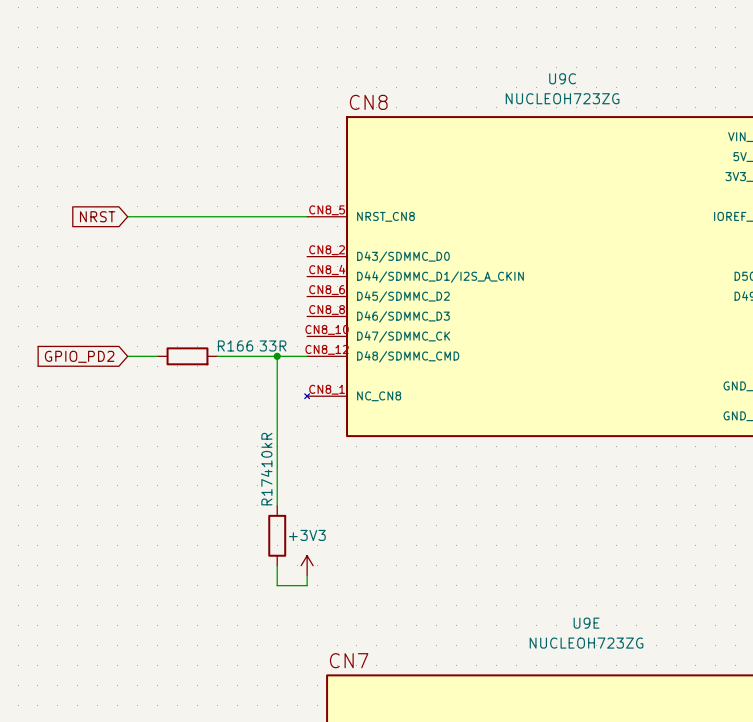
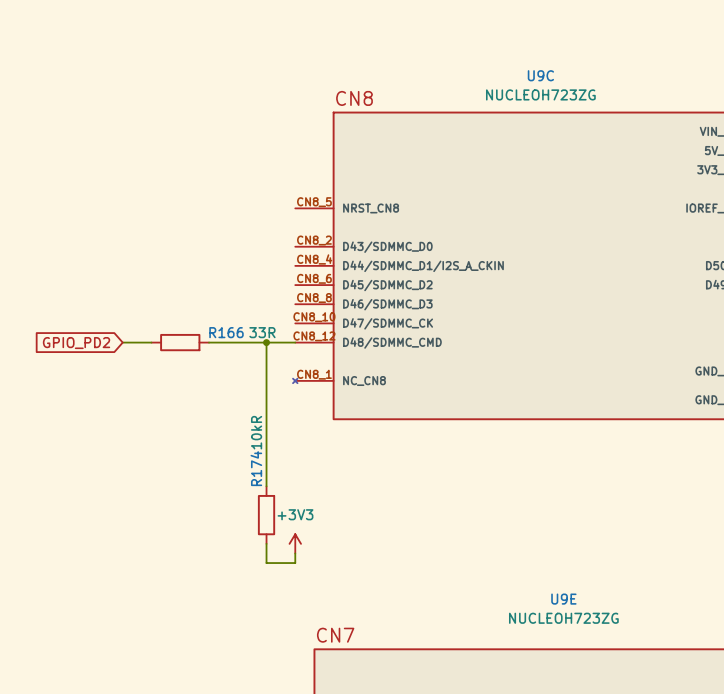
global label: NRST (97, 216) -> none
wire: (127, 216) (307, 216) -> none

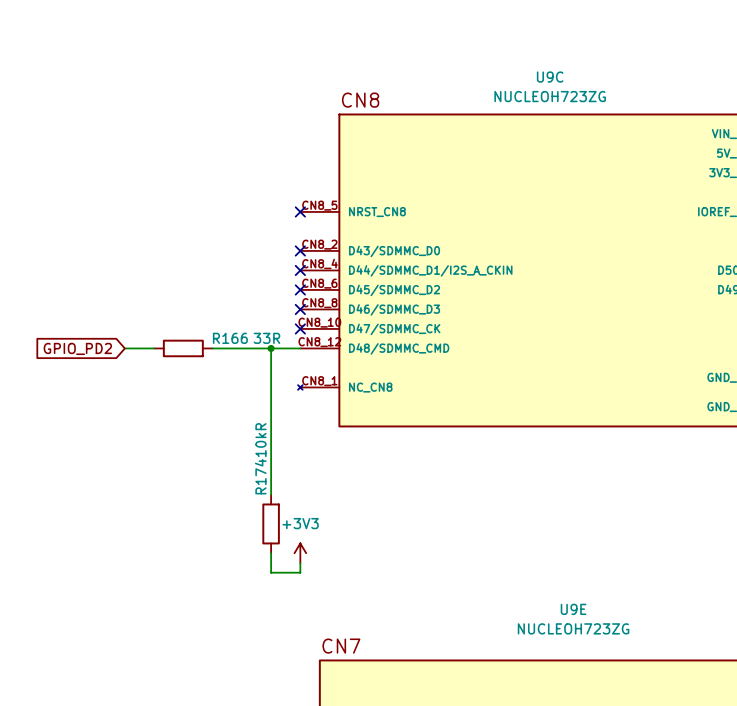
no-connect mark: none -> (300, 211)
no-connect mark: none -> (300, 250)
no-connect mark: none -> (300, 270)
no-connect mark: none -> (300, 289)
no-connect mark: none -> (300, 309)
no-connect mark: none -> (300, 328)

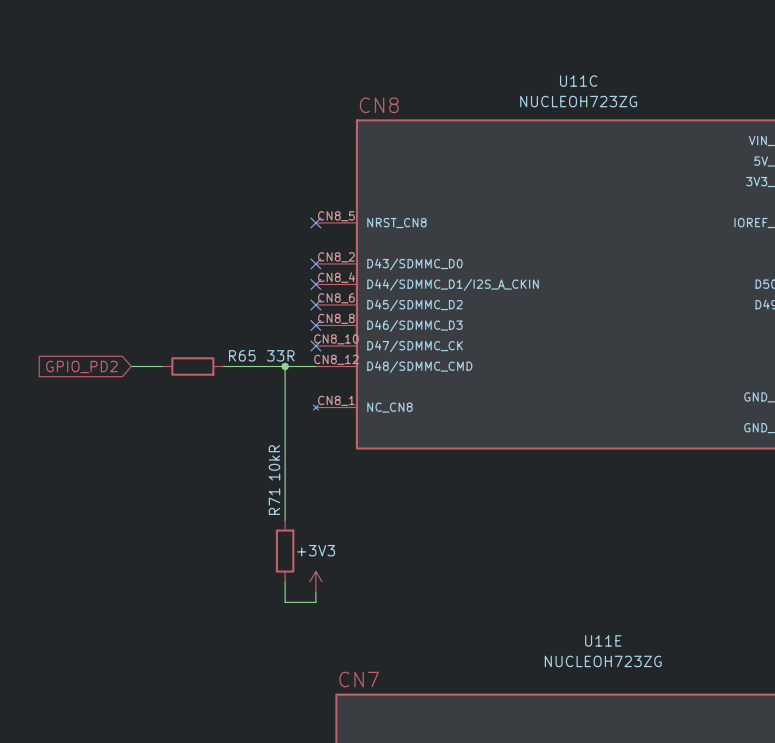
U9C name: U9C (550, 77) -> U11C (578, 81)
R166 name: R166 (230, 338) -> R65 (242, 355)
R174 name: R174 (260, 476) -> R71 (274, 501)
U9E name: U9E (573, 609) -> U11E (603, 640)

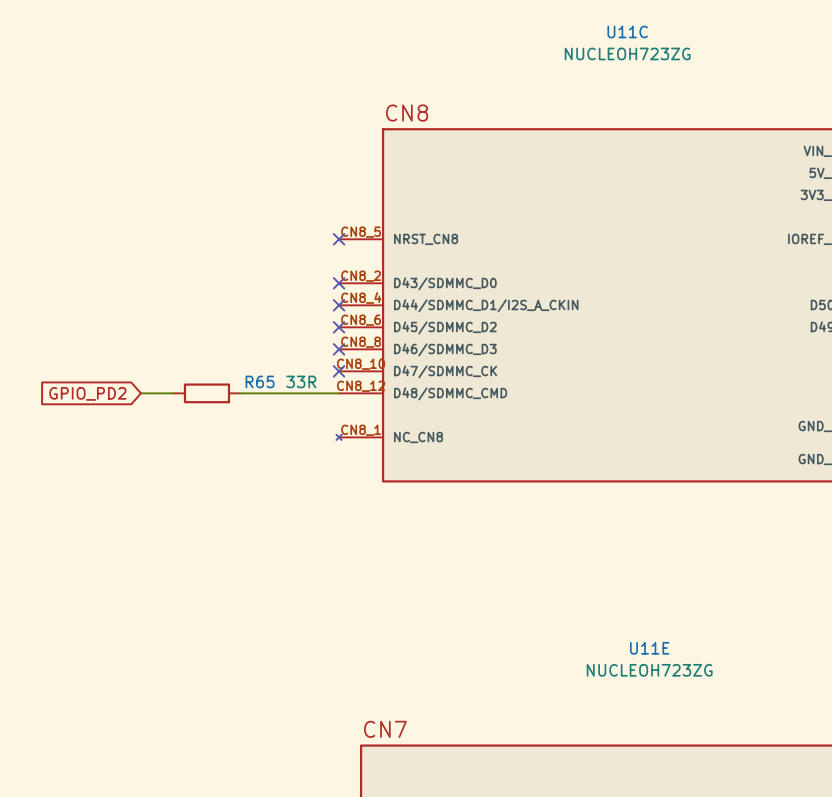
U11C name position: U11C (578, 81) -> U11C (627, 31)
U11C value position: NUCLEOH723ZG (578, 101) -> NUCLEOH723ZG (627, 53)
wire: (285, 366) (285, 520) -> none
junction: (285, 366) -> none
R71: 10kR (285, 551) -> none
wire: (285, 581) (285, 602) (315, 602) (315, 592) -> none
power symbol: +3V3 (315, 581) -> none
U11E name position: U11E (603, 640) -> U11E (649, 648)
U11E value position: NUCLEOH723ZG (603, 661) -> NUCLEOH723ZG (649, 670)

